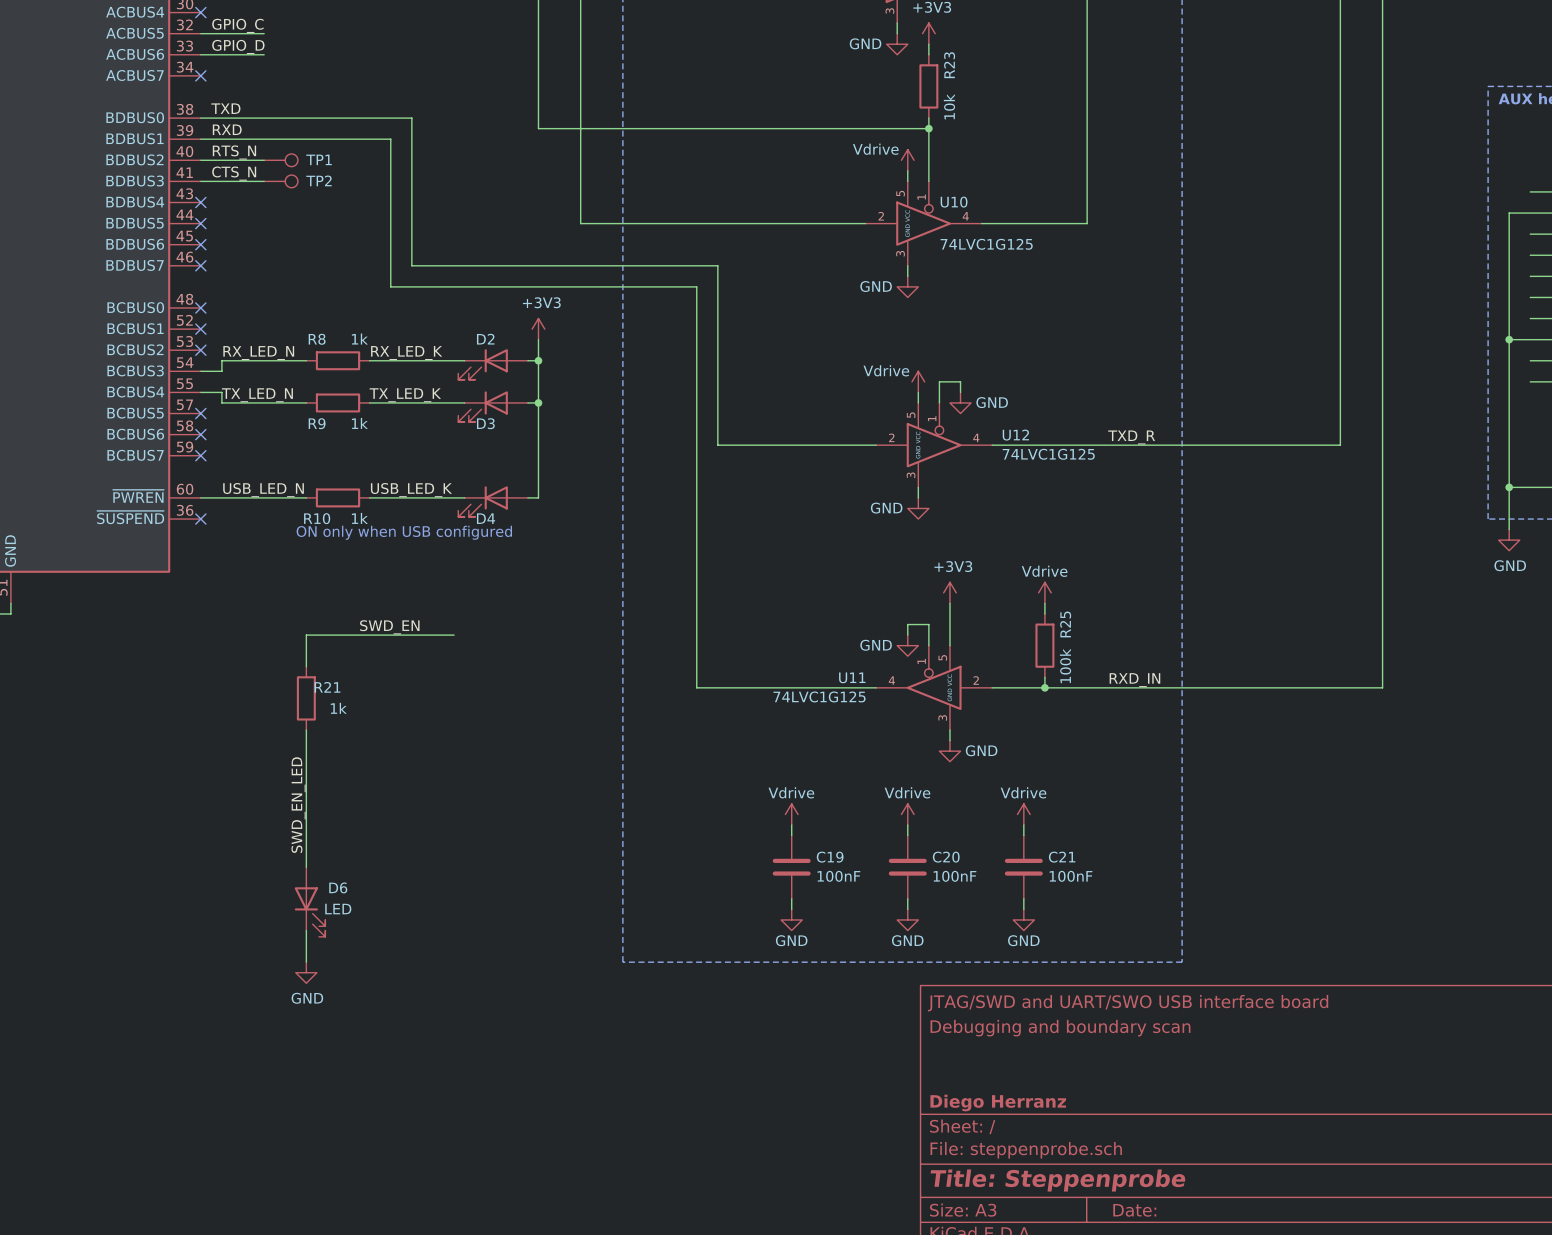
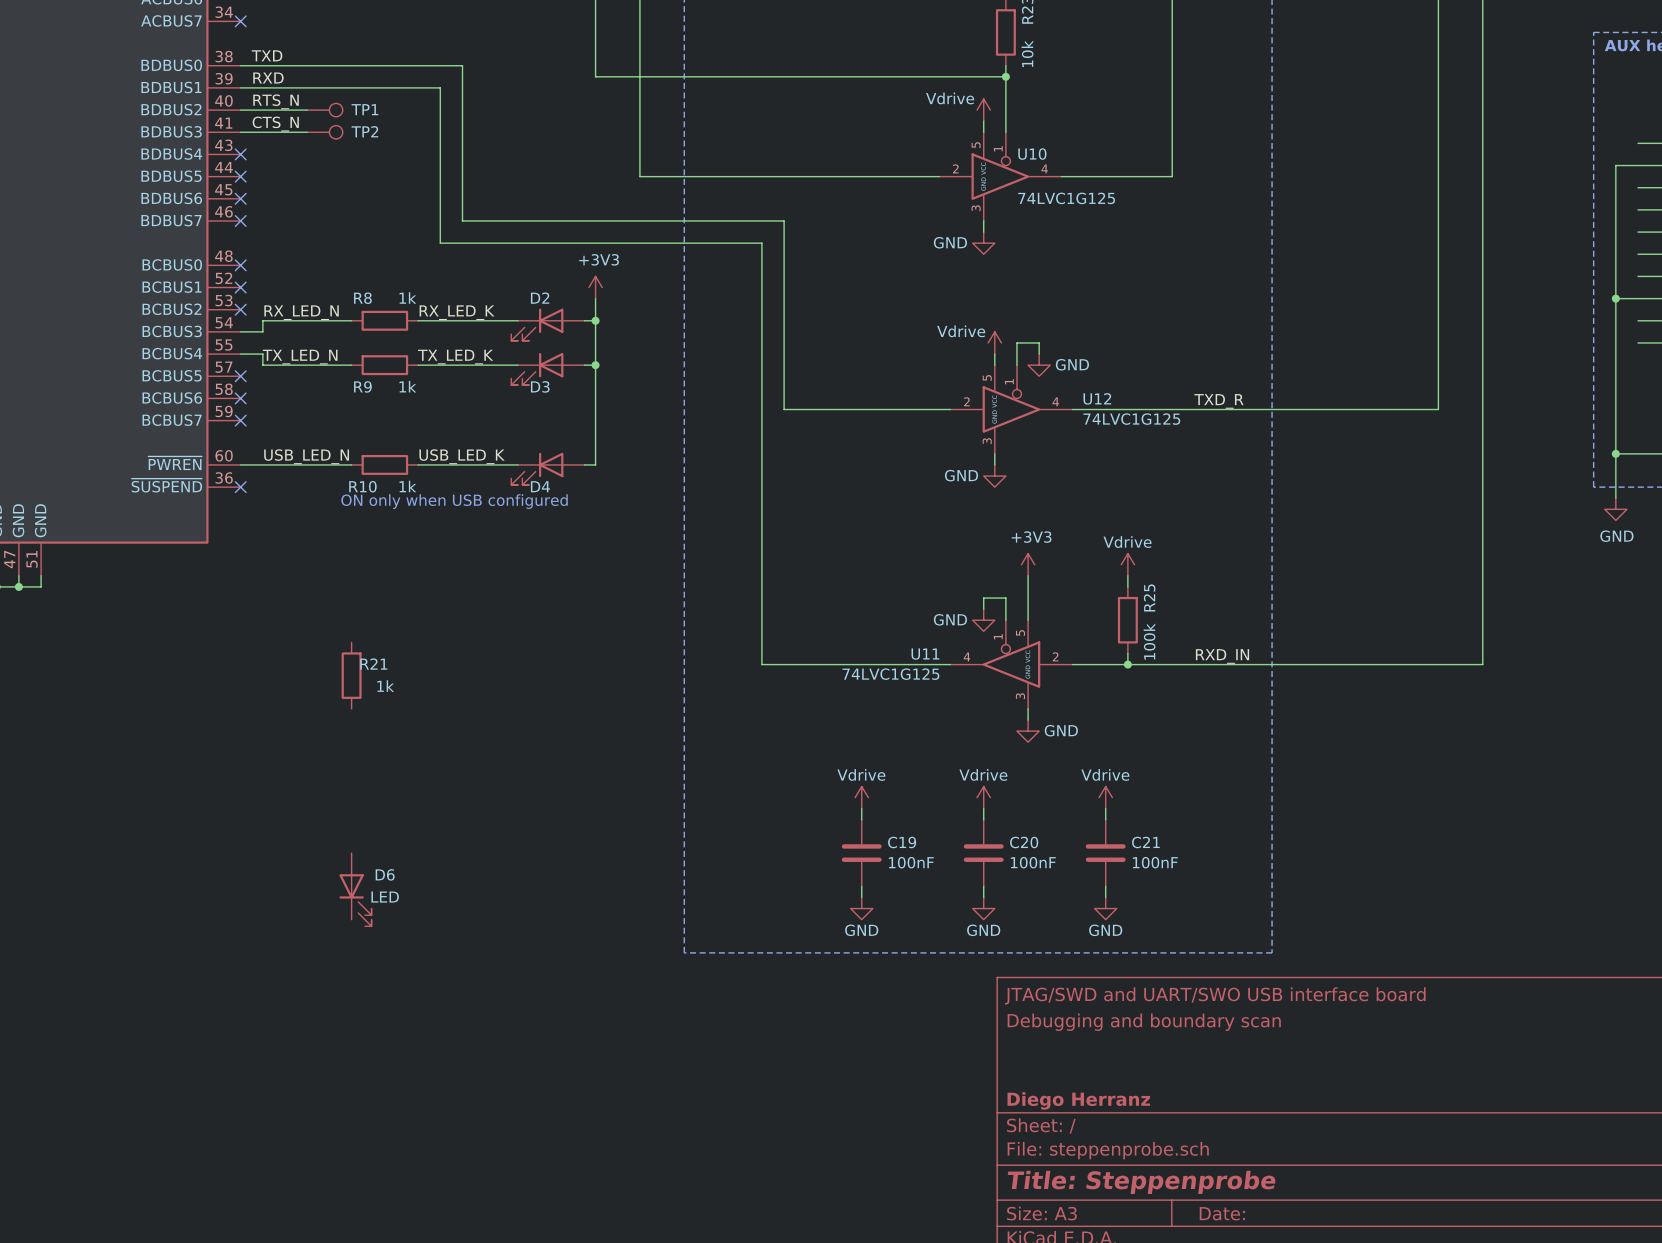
label: SWD_EN (389, 627) -> none
wire: (454, 635) (306, 635) (306, 666) -> none
wire: (306, 730) (306, 867) -> none
label: SWD_EN_LED (298, 805) -> none
wire: (306, 930) (306, 962) -> none
power symbol: GND (306, 972) -> none

